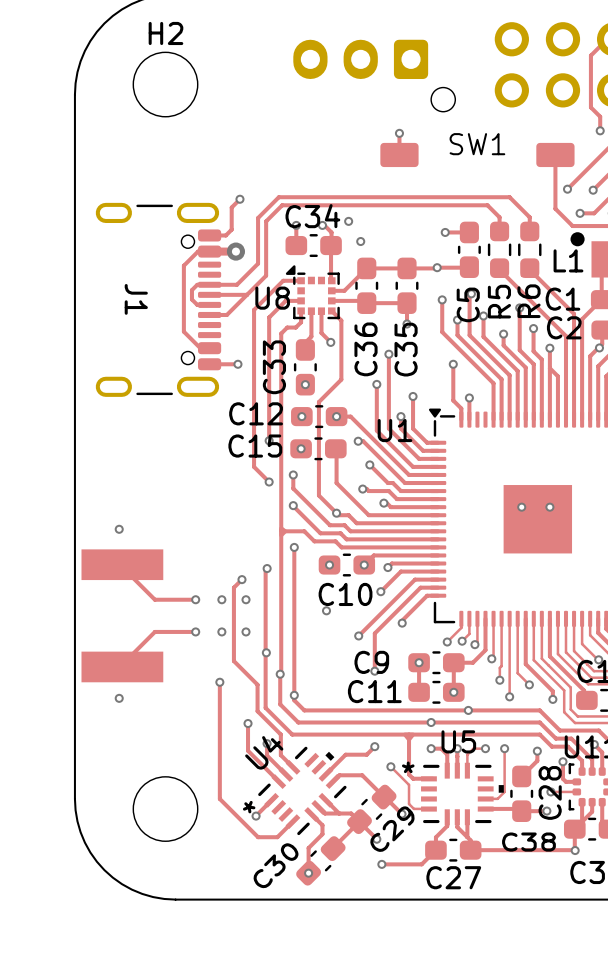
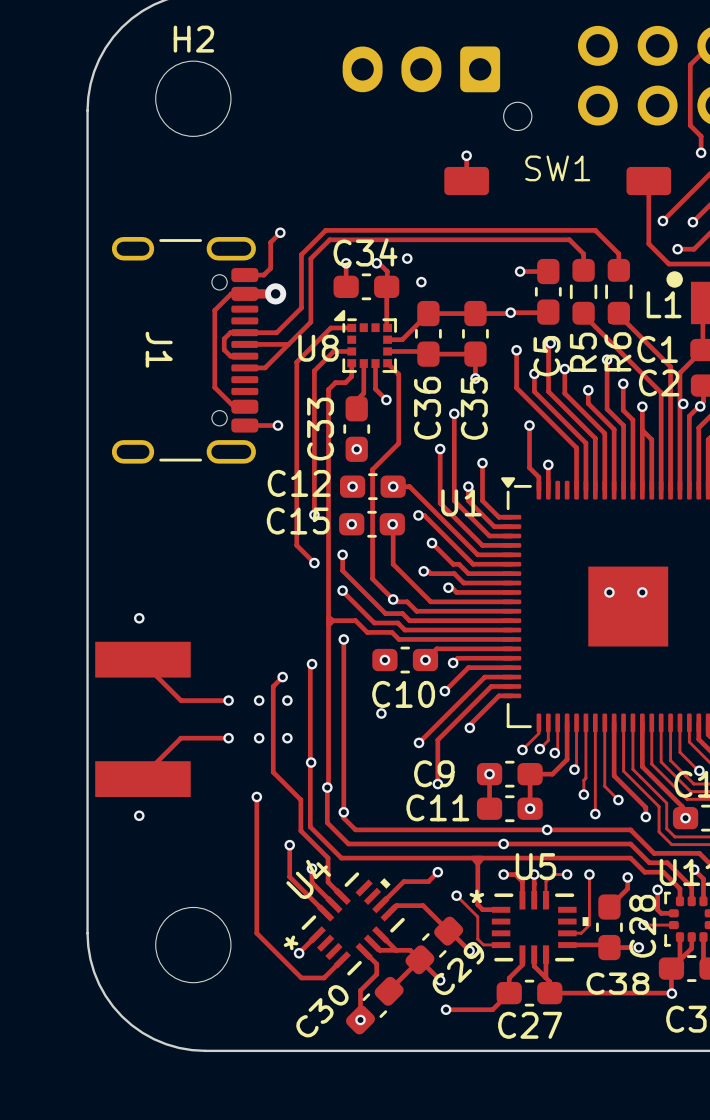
via: none -> (683, 403)
via: none -> (392, 524)
via: none -> (685, 818)

